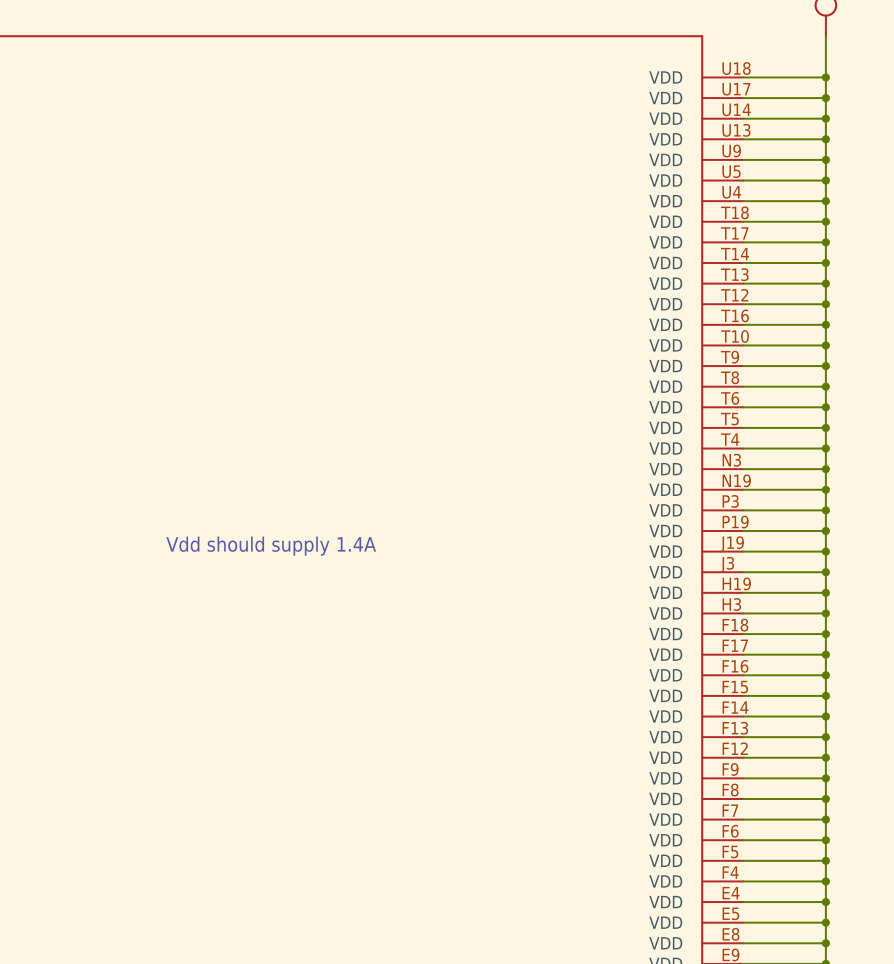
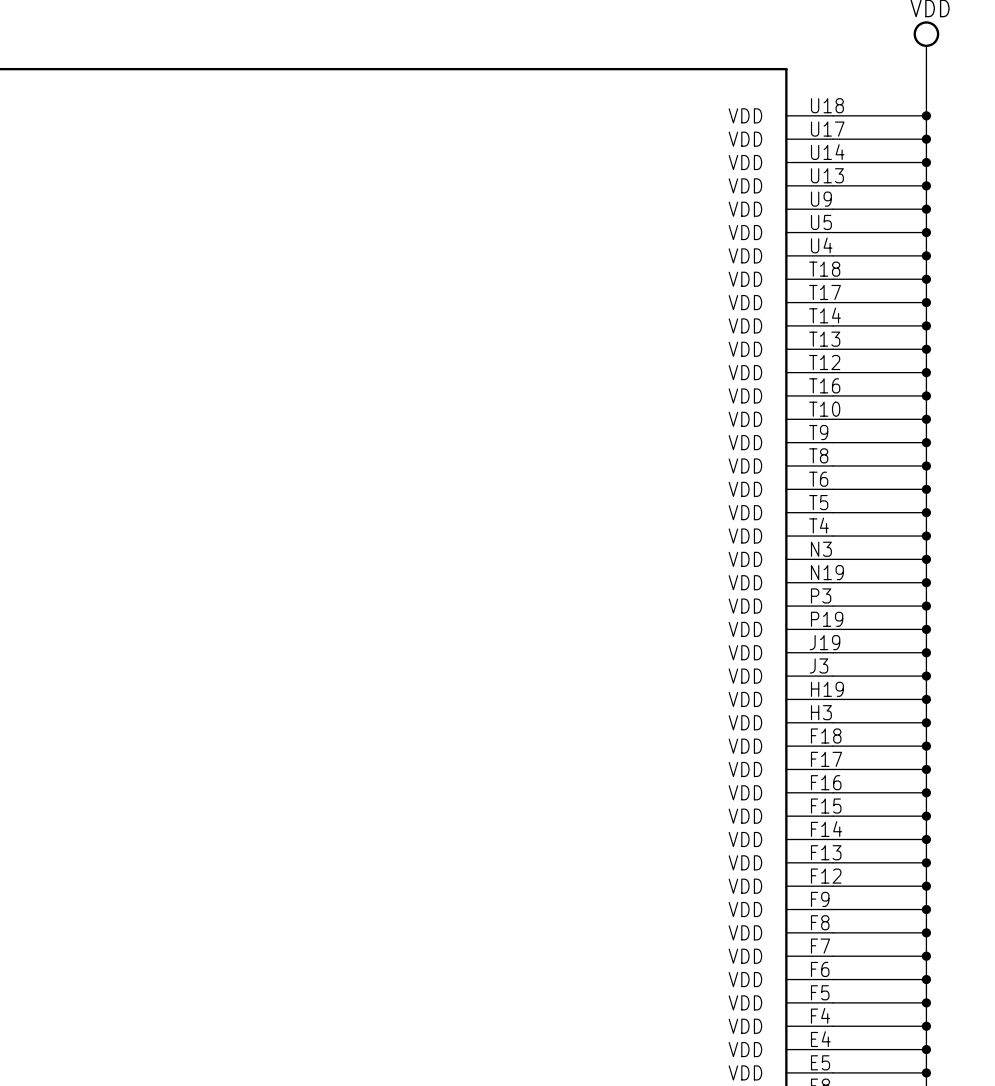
text: Vdd should supply 1.4A (271, 546) -> none

